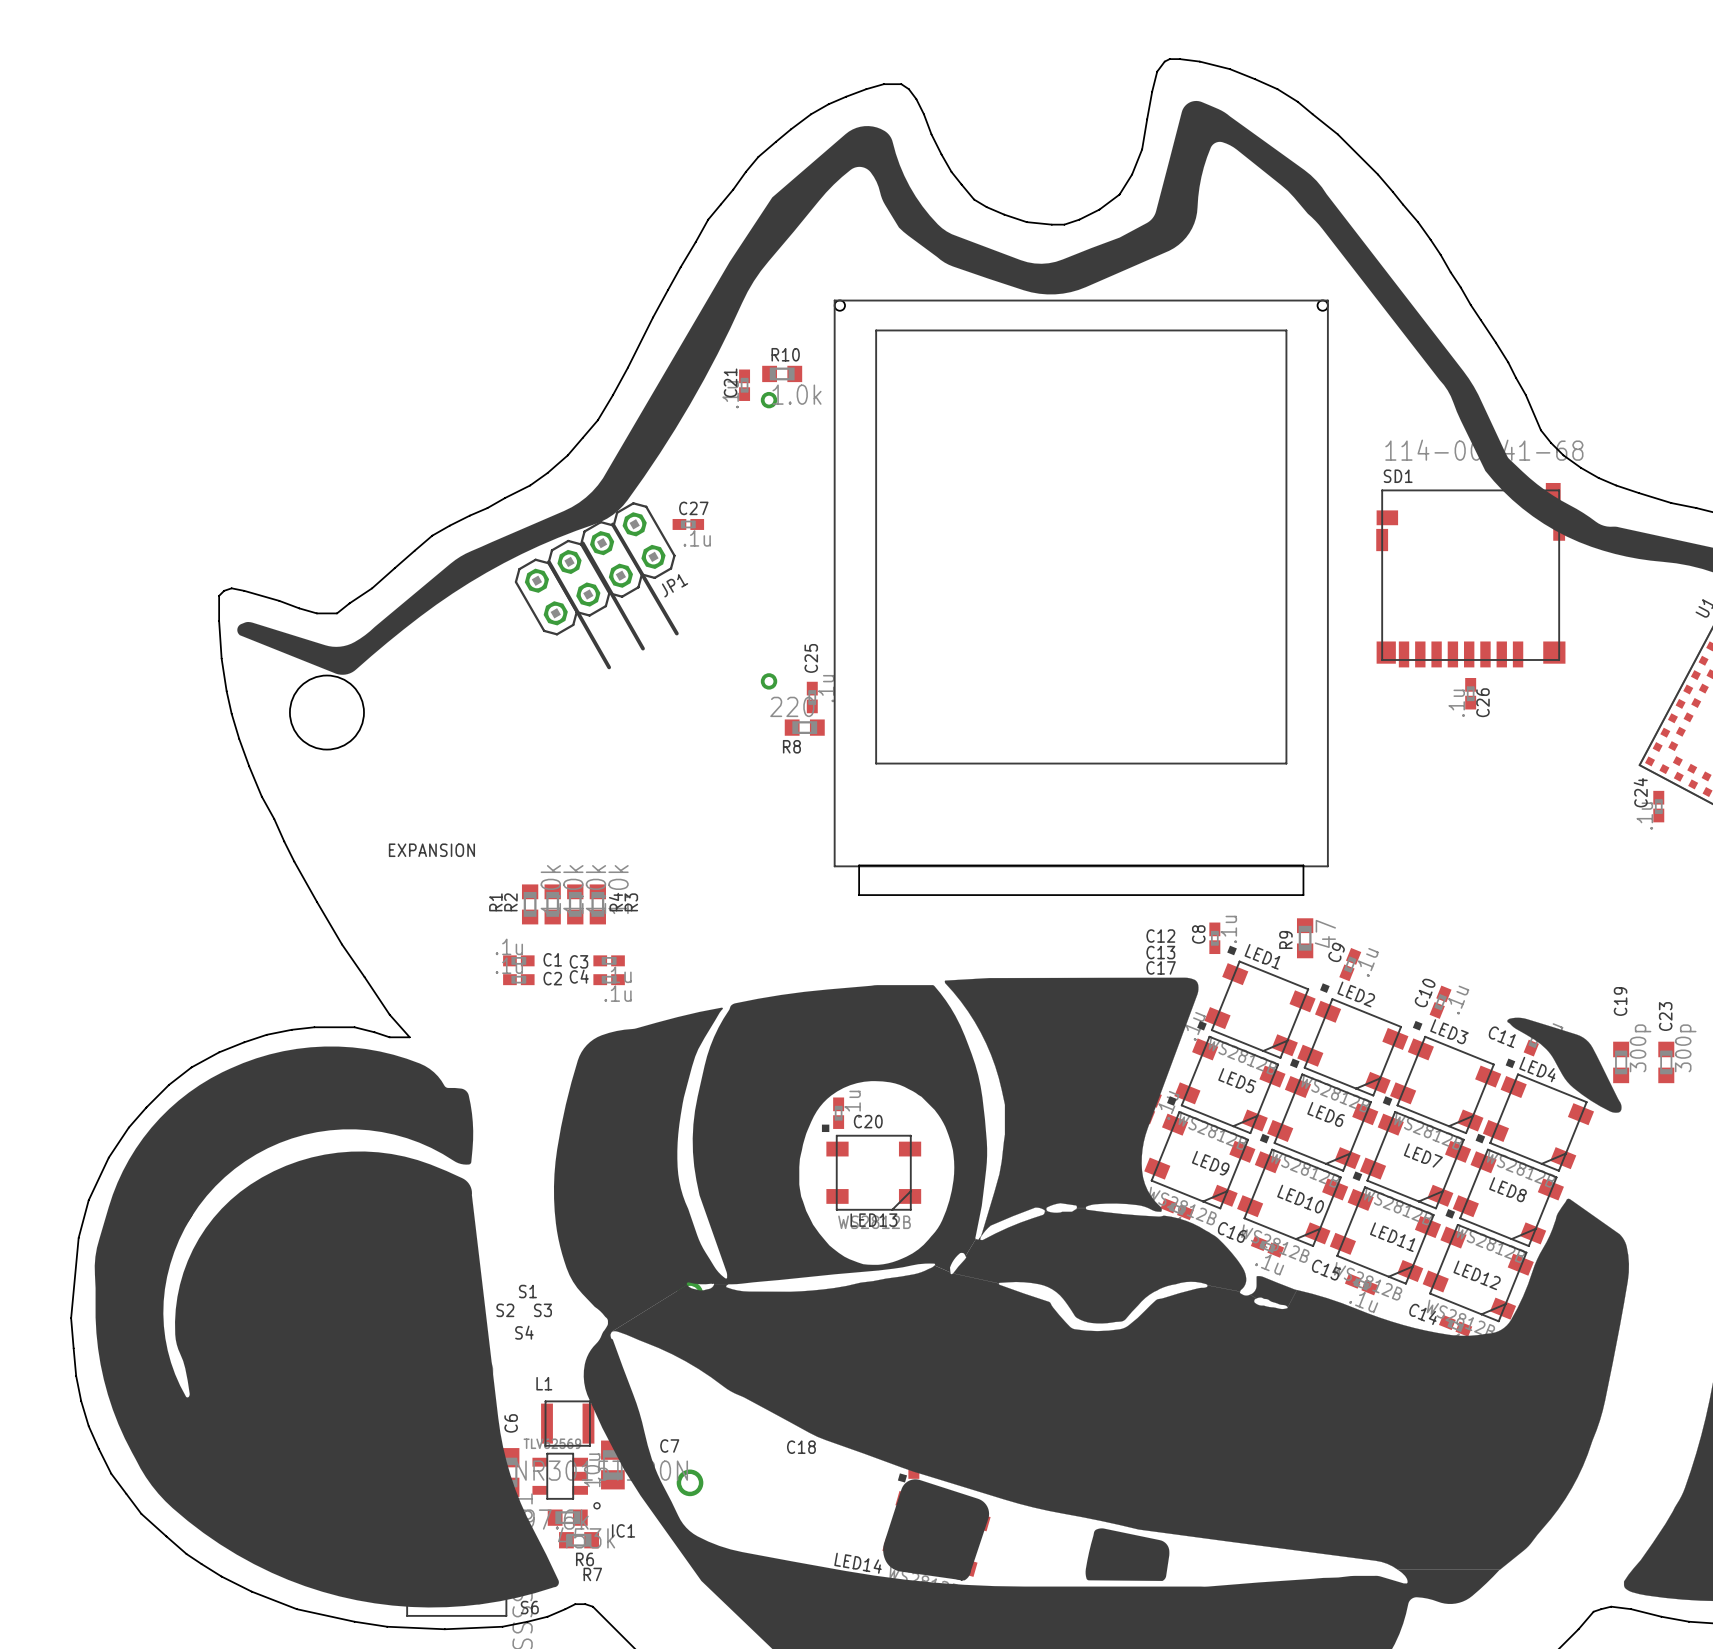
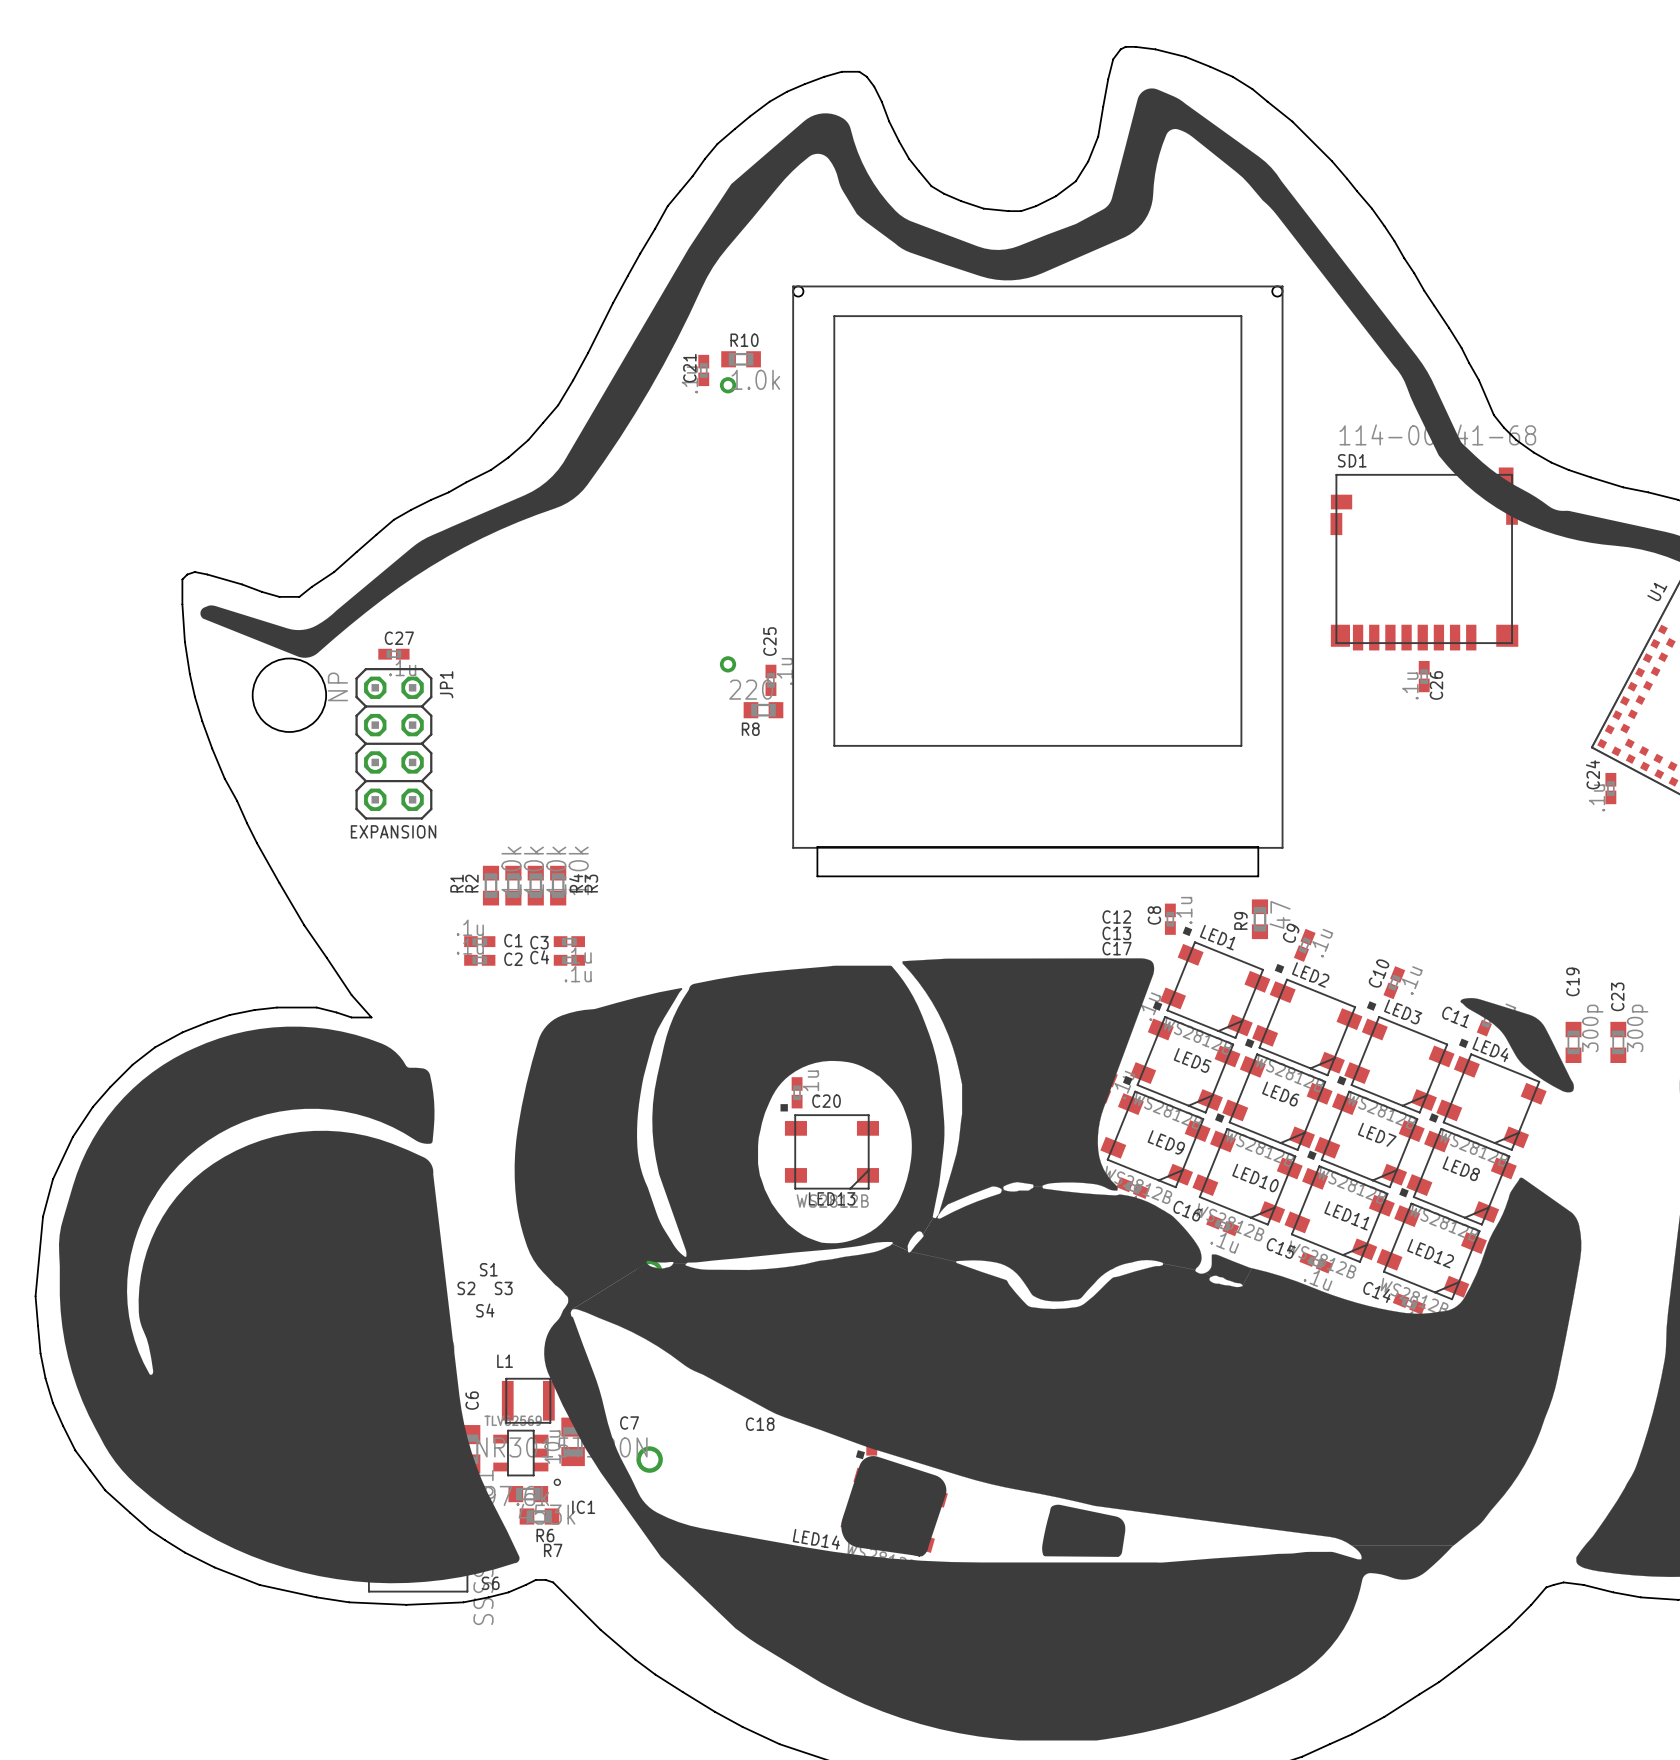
line: (612, 524) (676, 633) -> none
C27 position: (688, 524) -> (393, 654)
line: (582, 543) (642, 648) -> none
line: (548, 562) (609, 667) -> none
JP1 rotation: 0° (595, 568) -> 60° counterclockwise (393, 743)
JP1 position: (595, 568) -> (393, 743)

